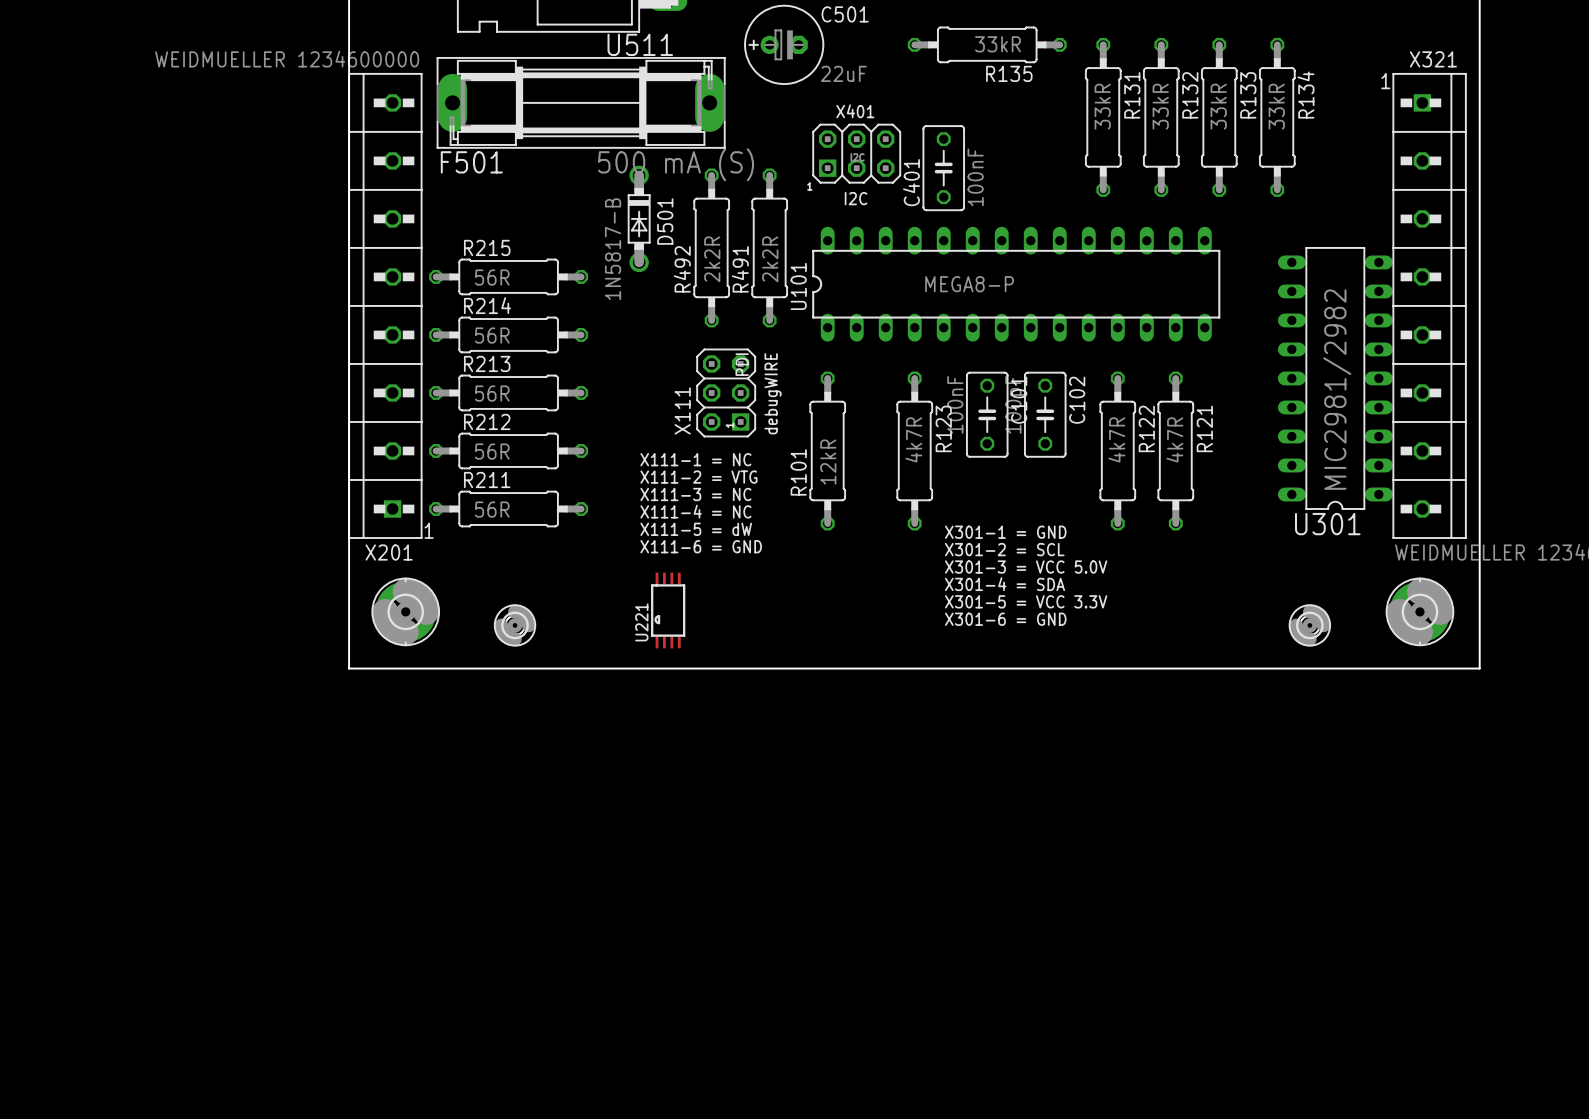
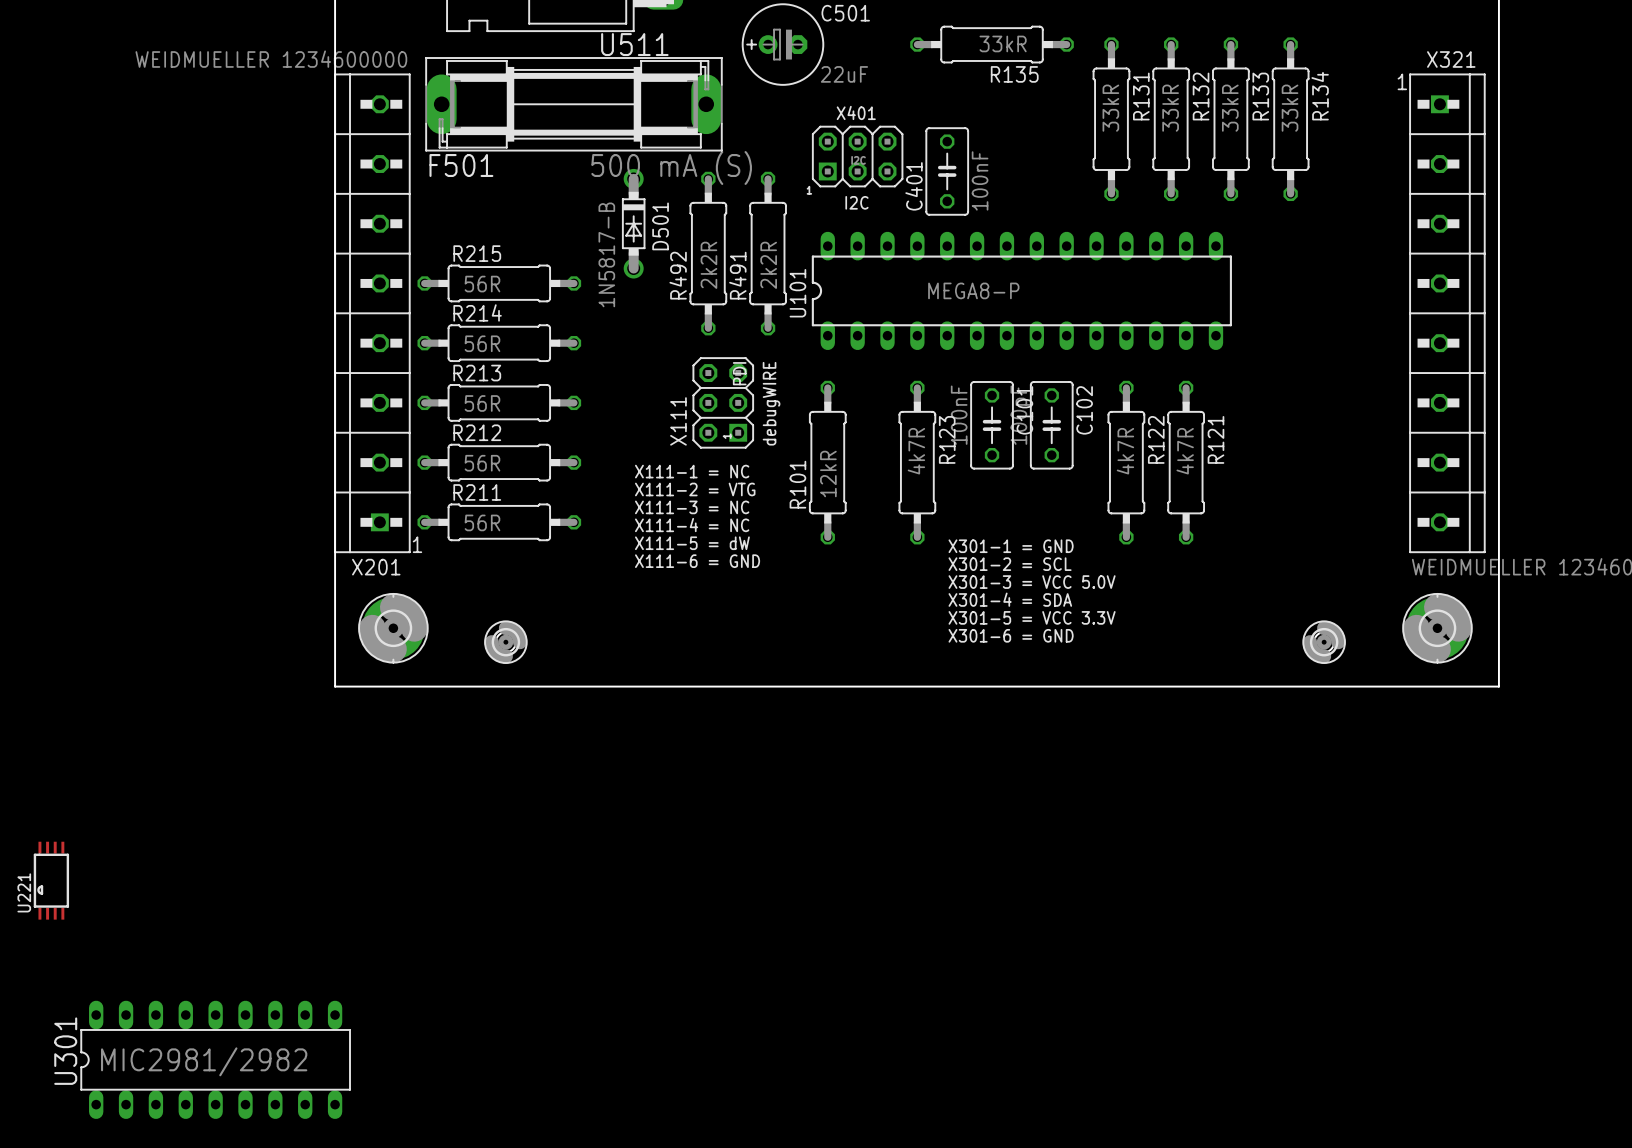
U301 rotation: 0° (1335, 378) -> 90° clockwise (215, 1059)
U301 position: (1335, 378) -> (215, 1059)
U221 position: (668, 610) -> (51, 880)

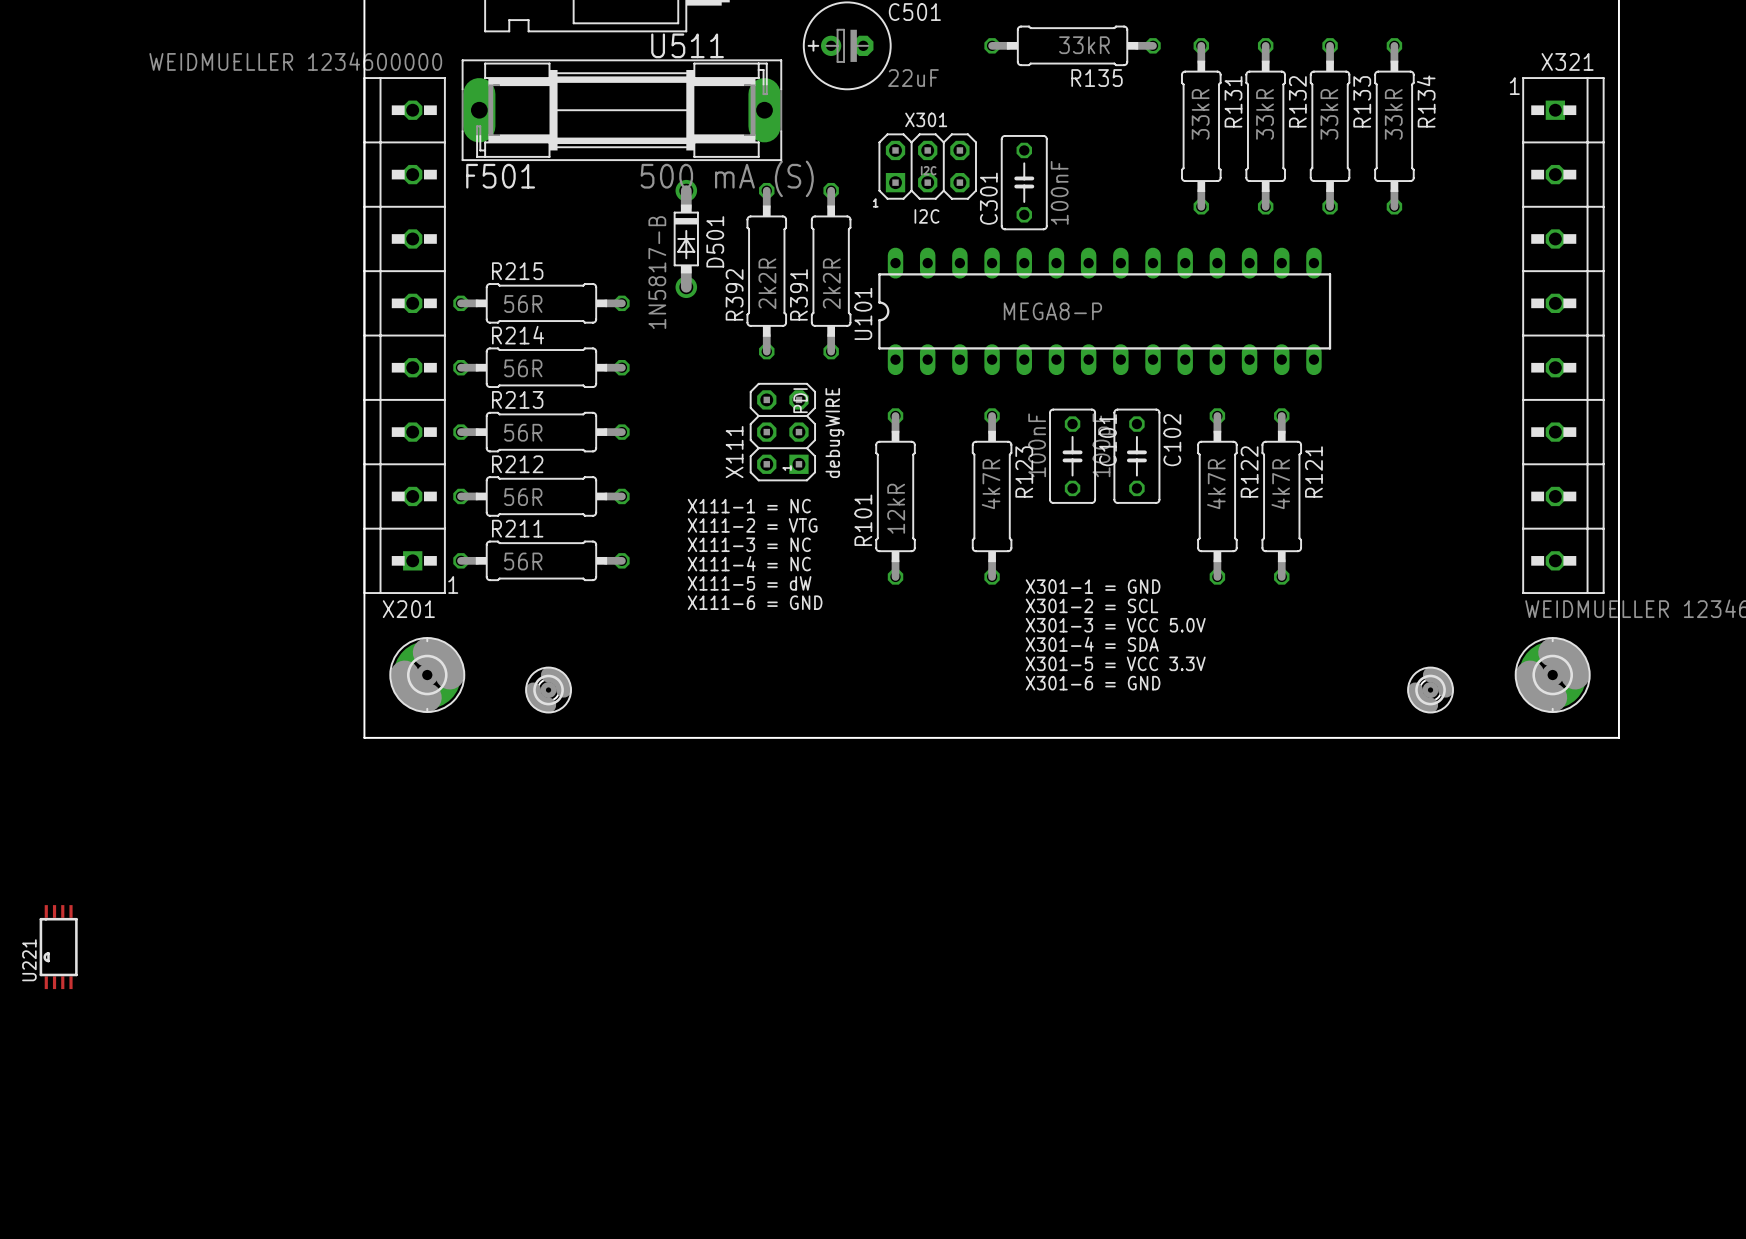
X401 name: X401 (856, 112) -> X301 (926, 119)
C401 name: C401 (914, 186) -> C301 (988, 198)
R492 name: R492 (678, 275) -> R392 (734, 294)
R491 name: R491 (737, 275) -> R391 (798, 294)
U301: MIC2981/2982 (215, 1059) -> none

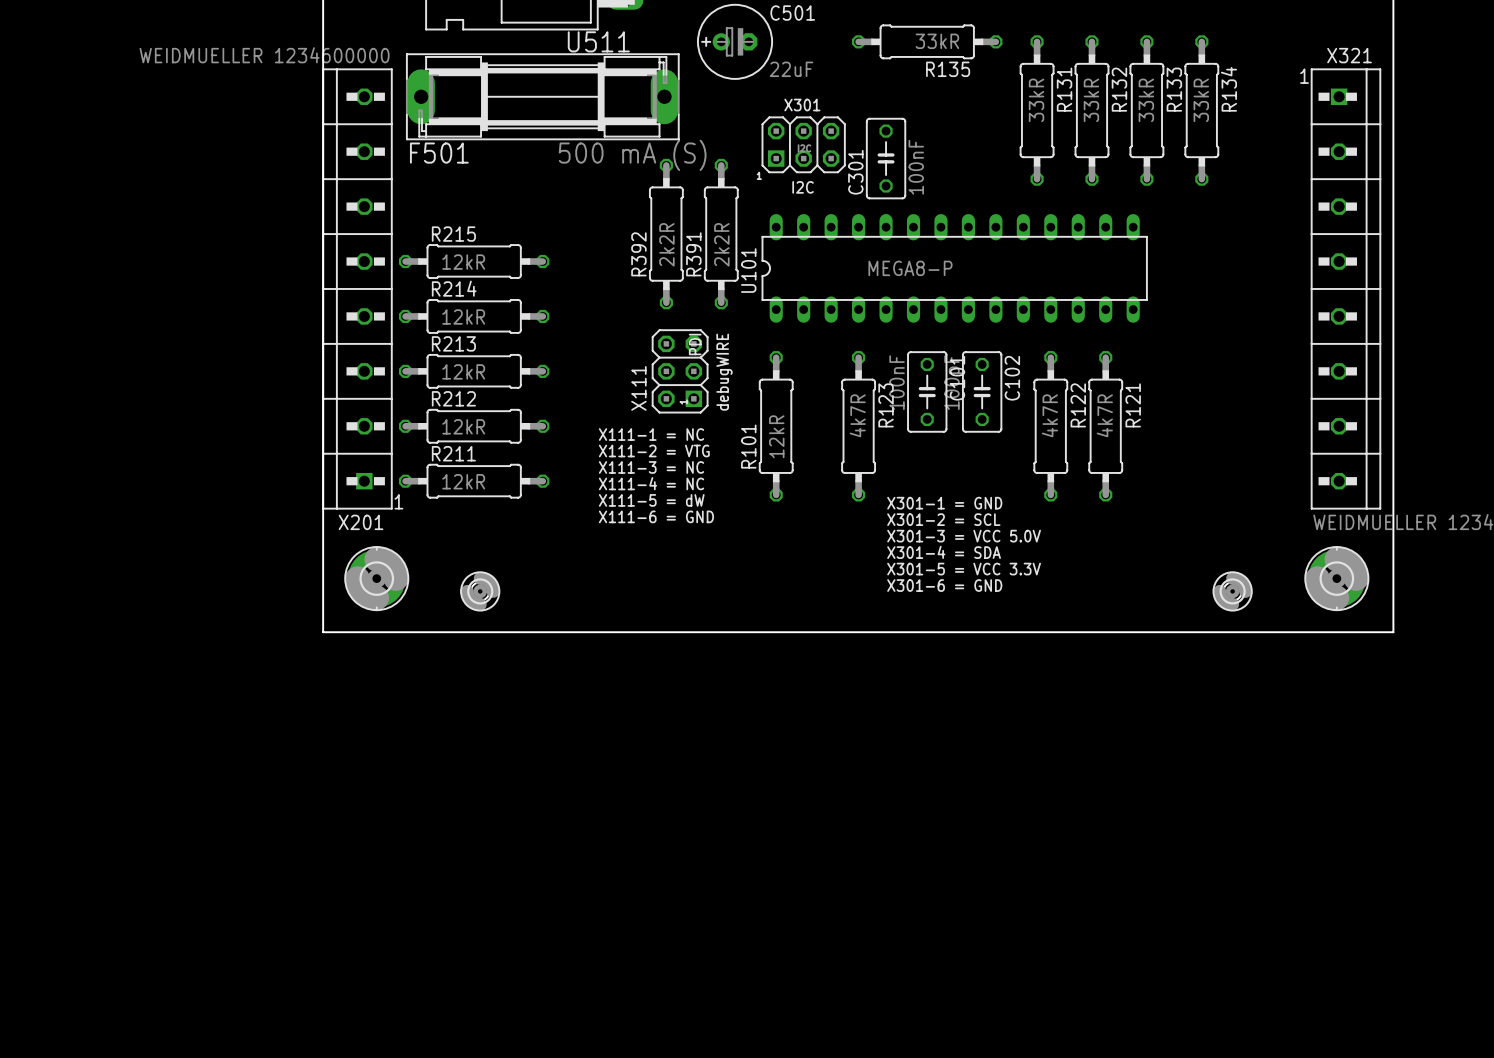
D501: 1N5817-B (686, 238) -> none
R215 value: 56R (523, 303) -> 12kR (463, 262)
R214 value: 56R (523, 368) -> 12kR (463, 316)
R213 value: 56R (523, 432) -> 12kR (463, 371)
R212 value: 56R (523, 497) -> 12kR (463, 426)
R211 value: 56R (523, 561) -> 12kR (463, 481)
U221: (58, 947) -> none

